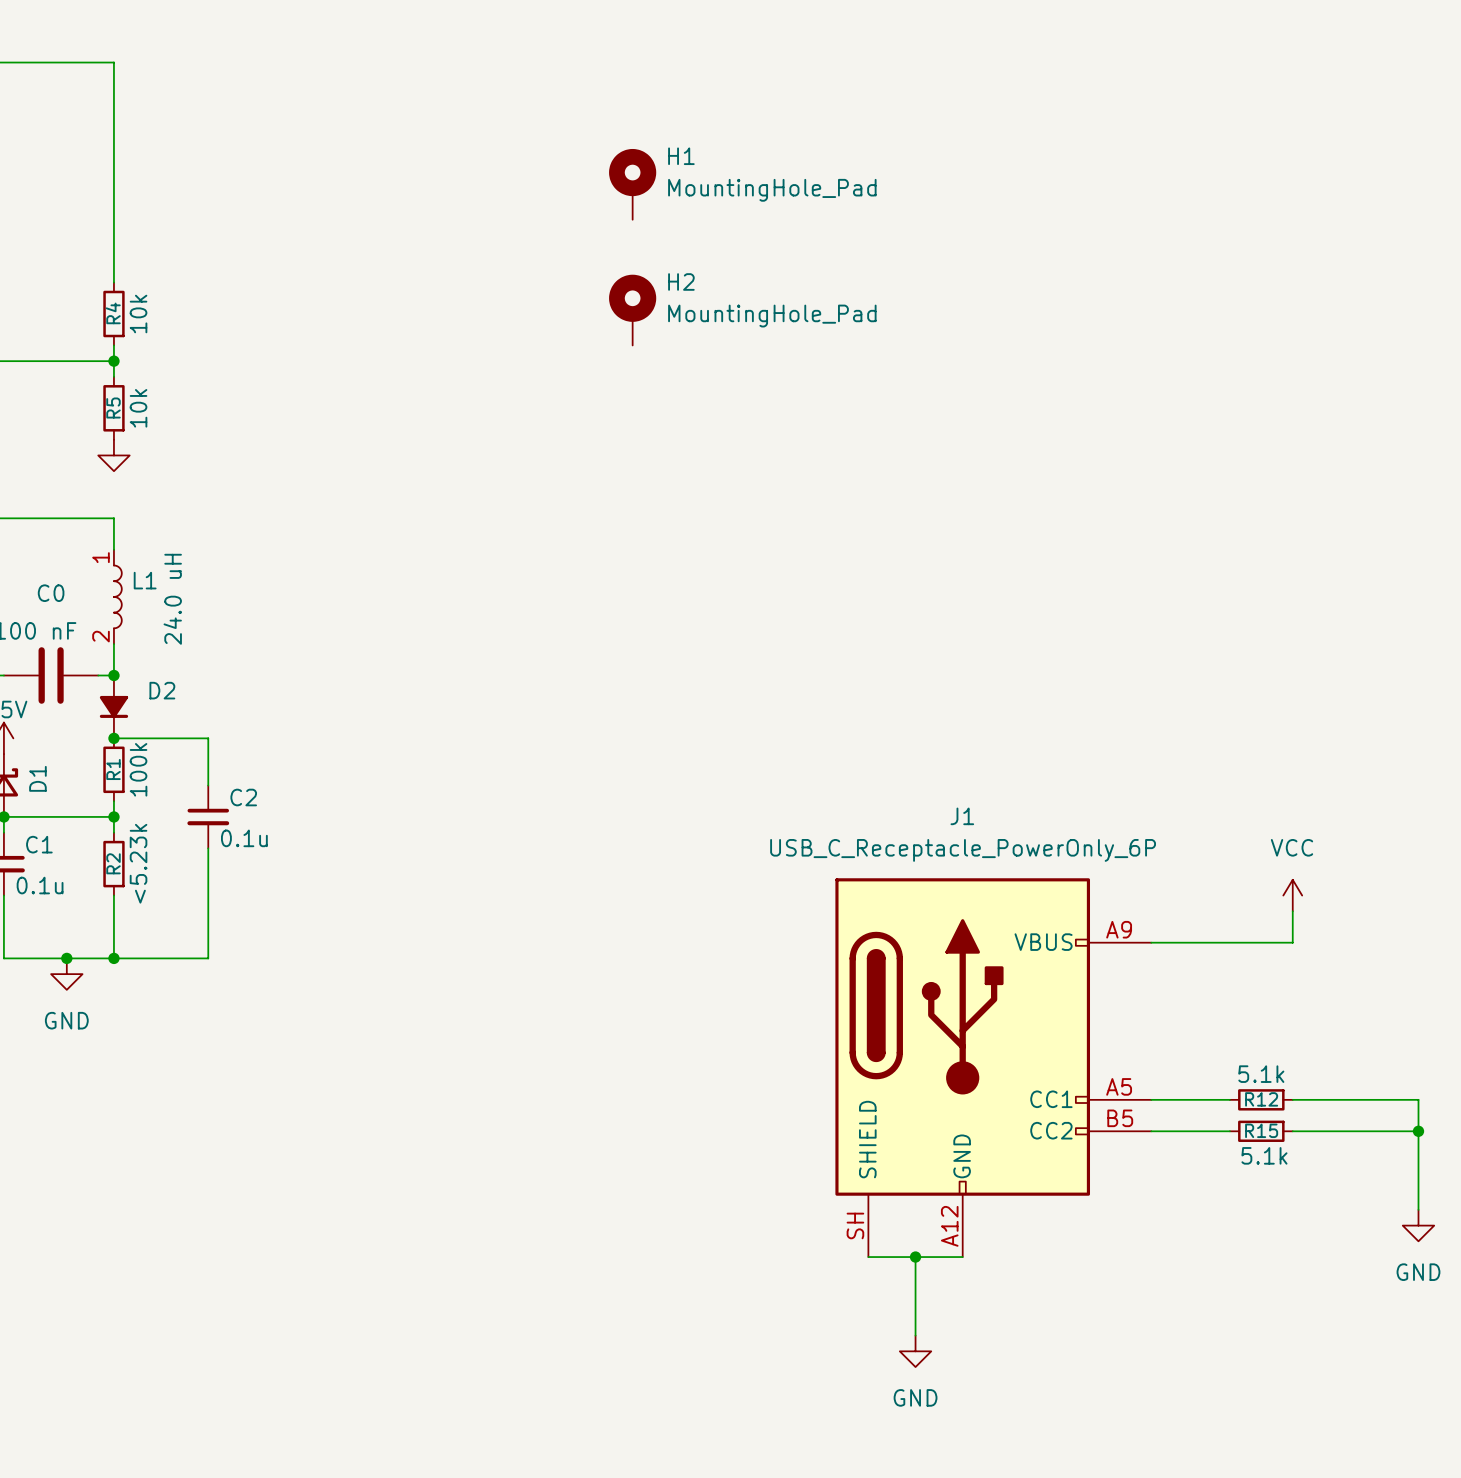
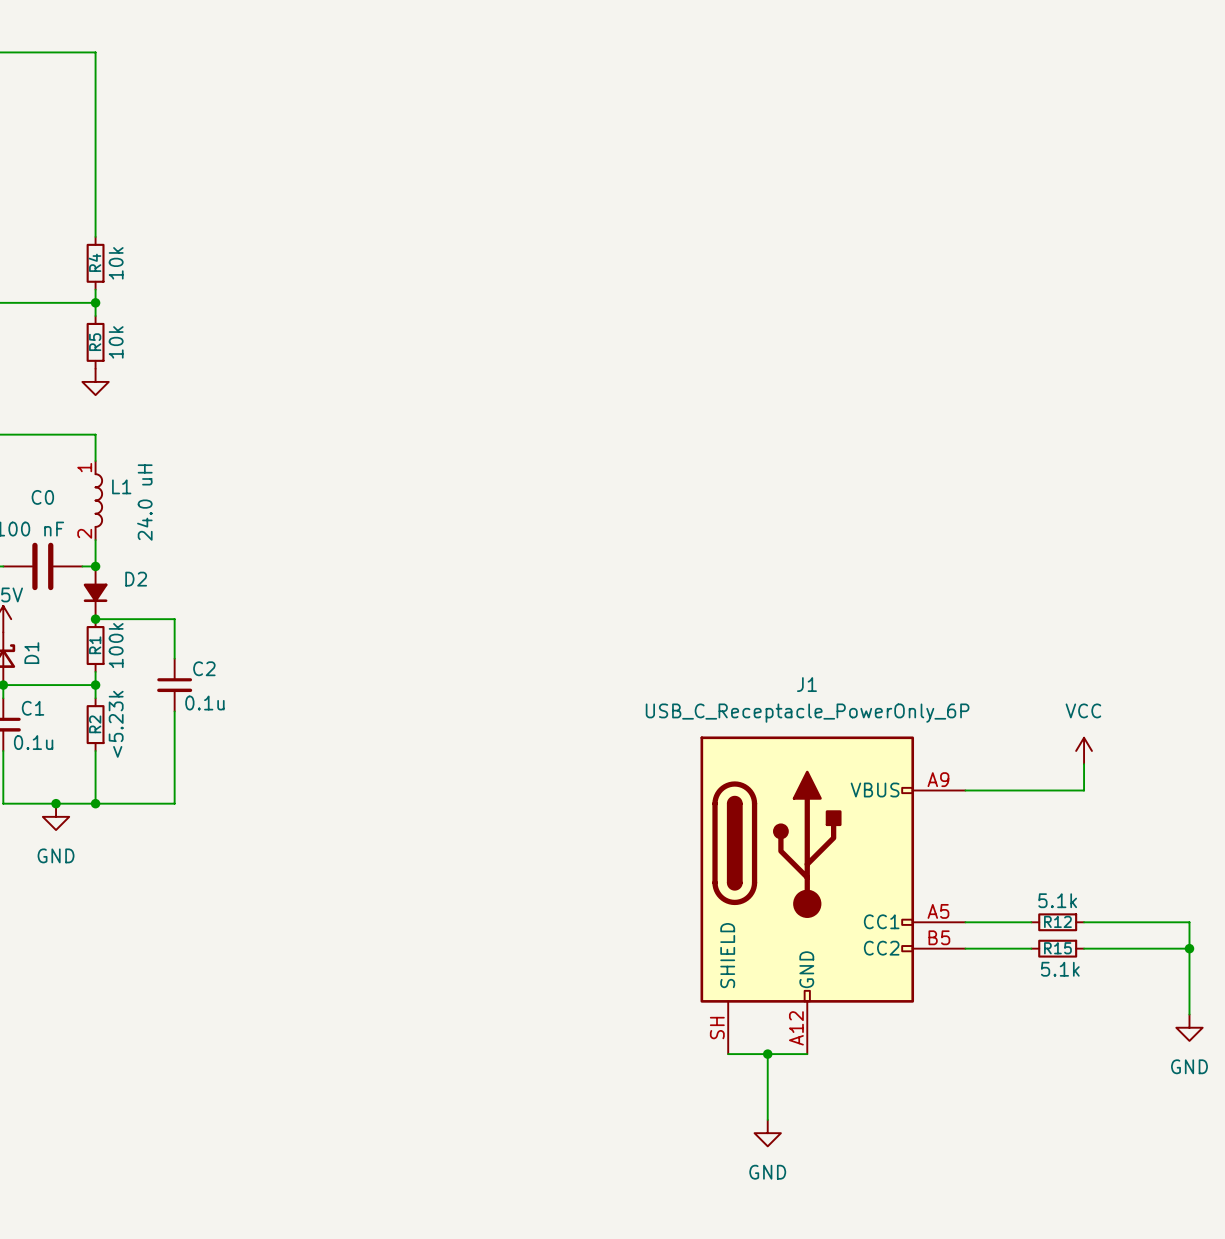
H1: MountingHole_Pad (632, 184) -> none
H2: MountingHole_Pad (632, 310) -> none

